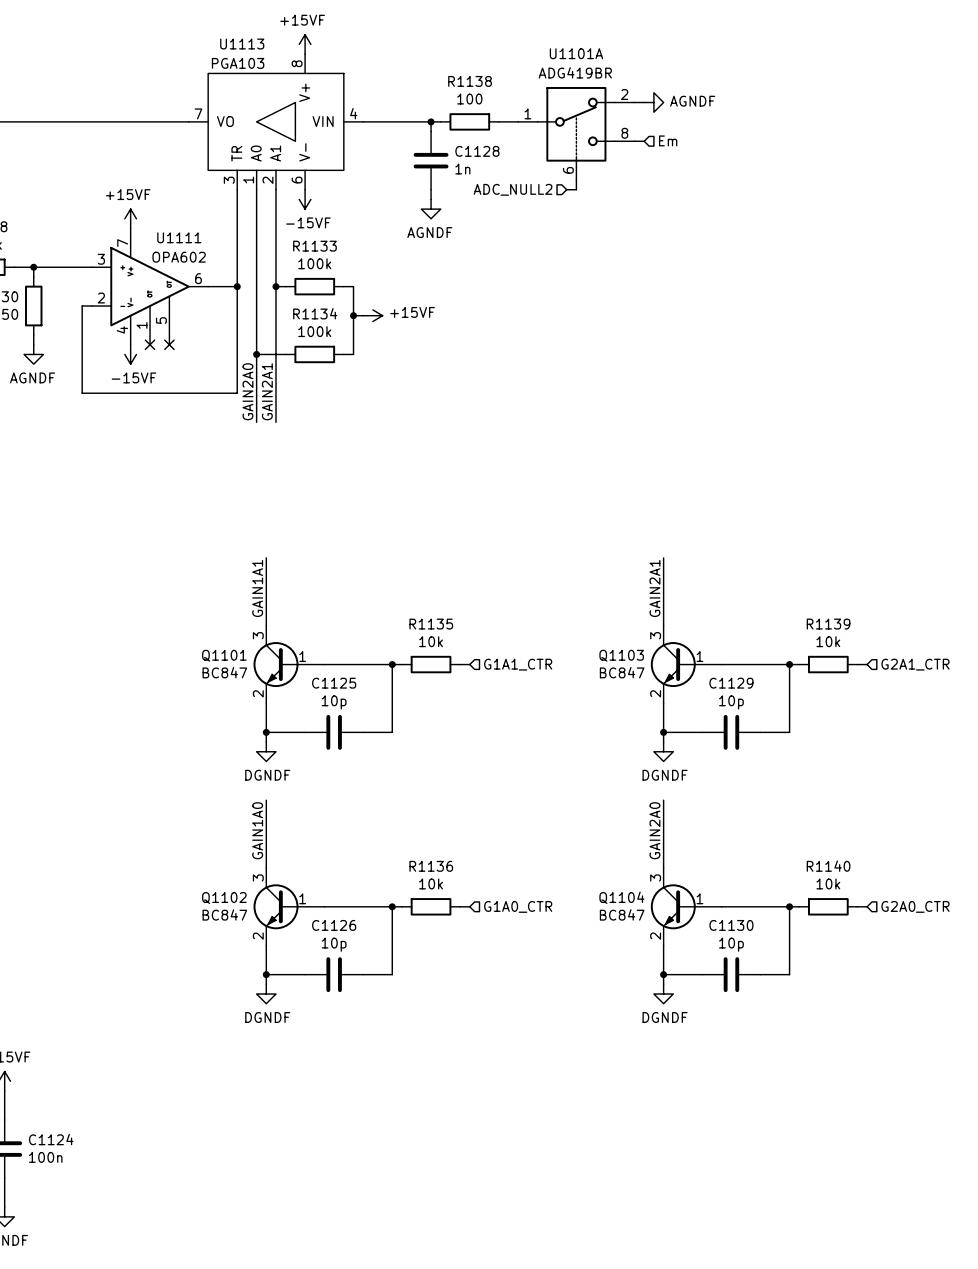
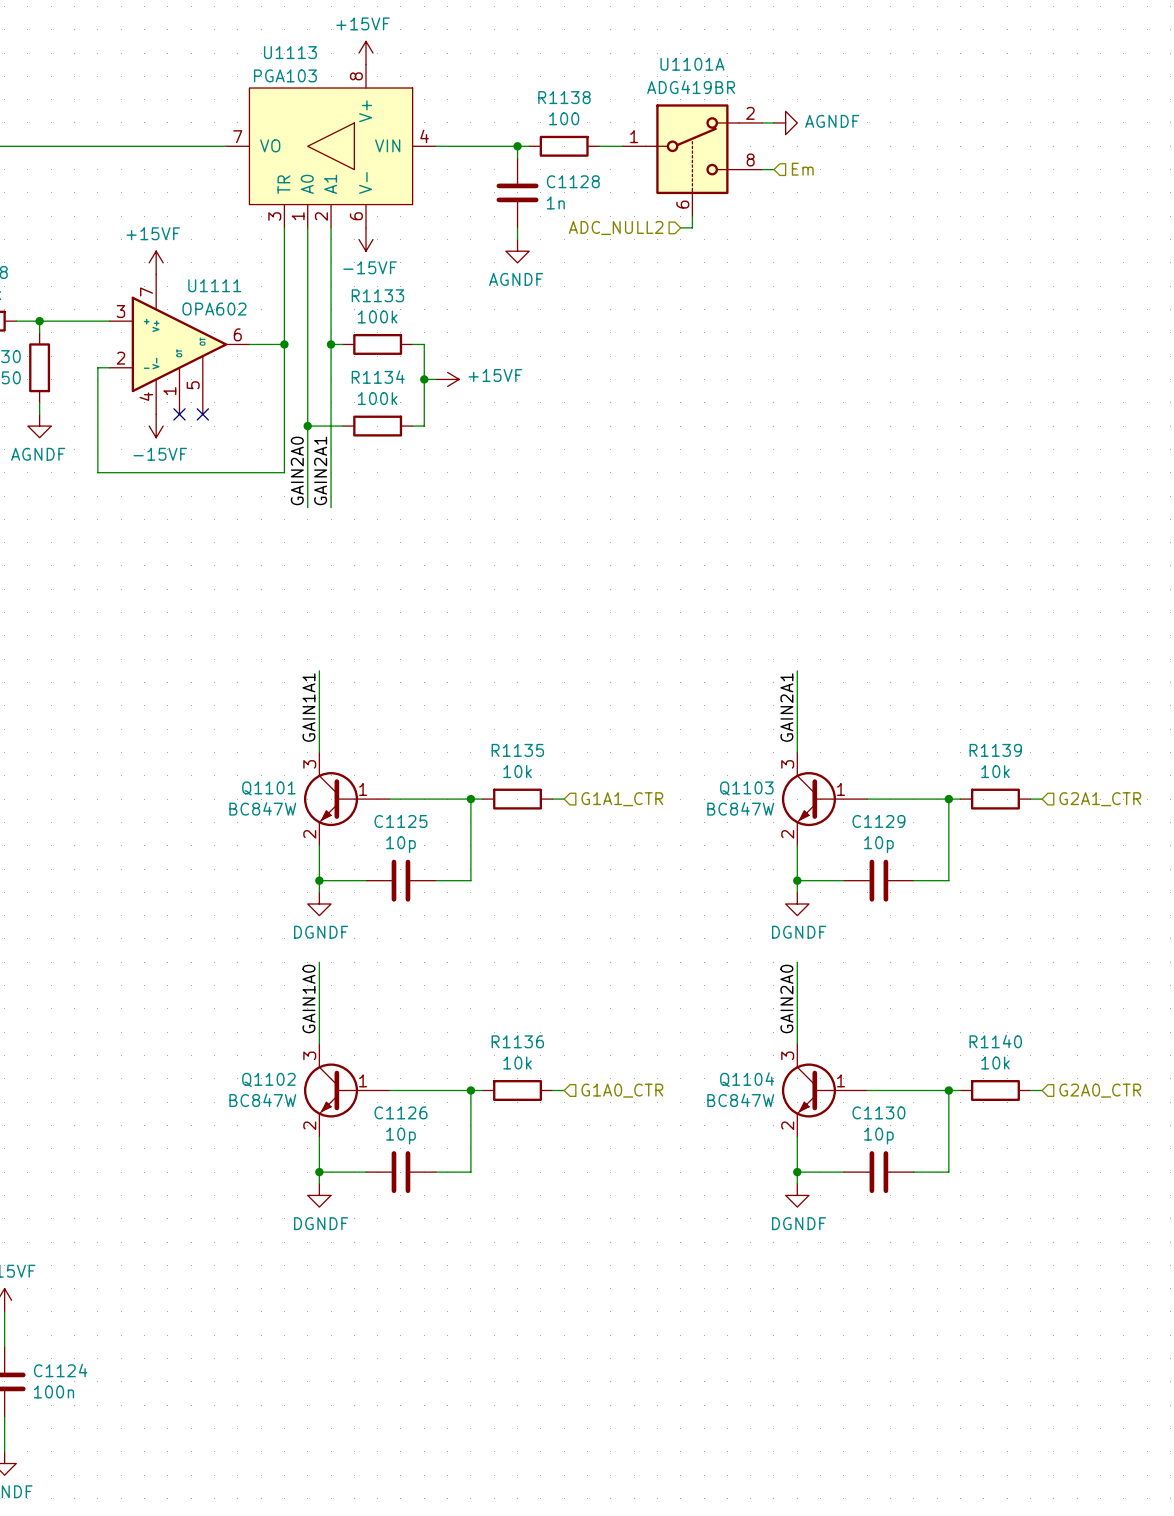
Q1101 value: BC847 (224, 672) -> BC847W (262, 808)
Q1103 value: BC847 (622, 672) -> BC847W (740, 808)
Q1102 value: BC847 (224, 914) -> BC847W (262, 1100)
Q1104 value: BC847 (622, 914) -> BC847W (740, 1100)

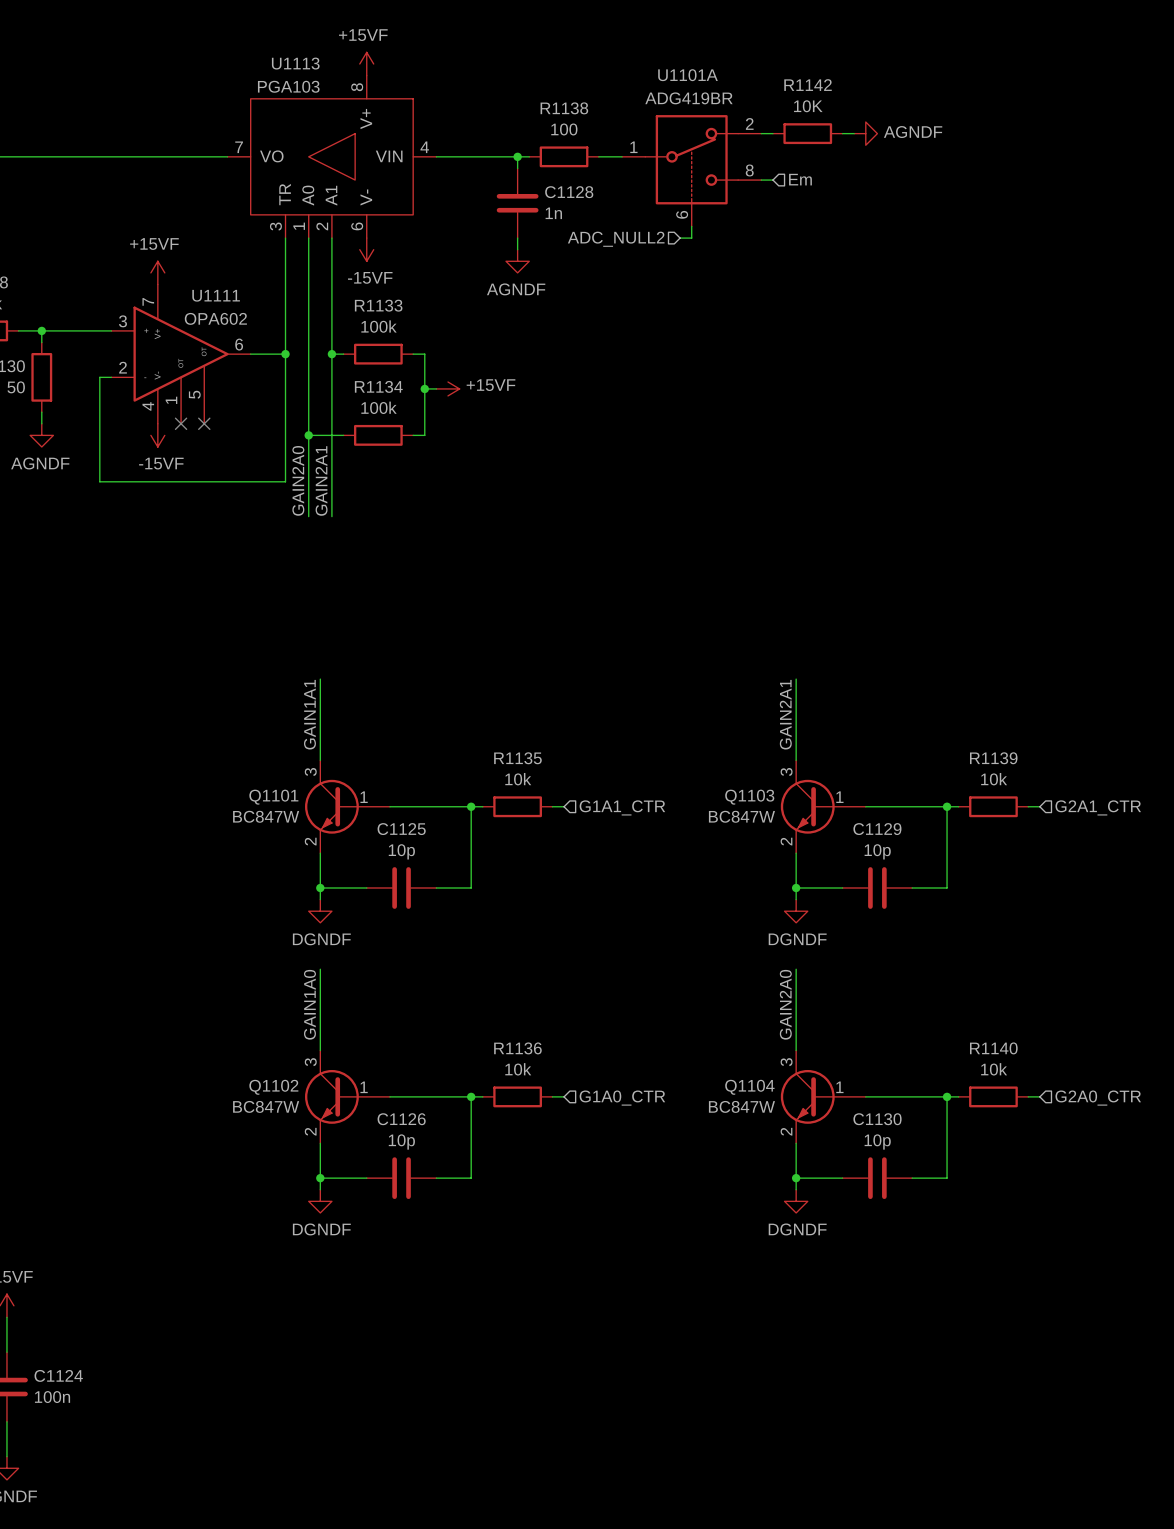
power symbol position: AGNDF (785, 122) -> AGNDF (865, 133)
R1142: none -> 10K (807, 133)
wire: none -> (842, 133) (854, 133)

